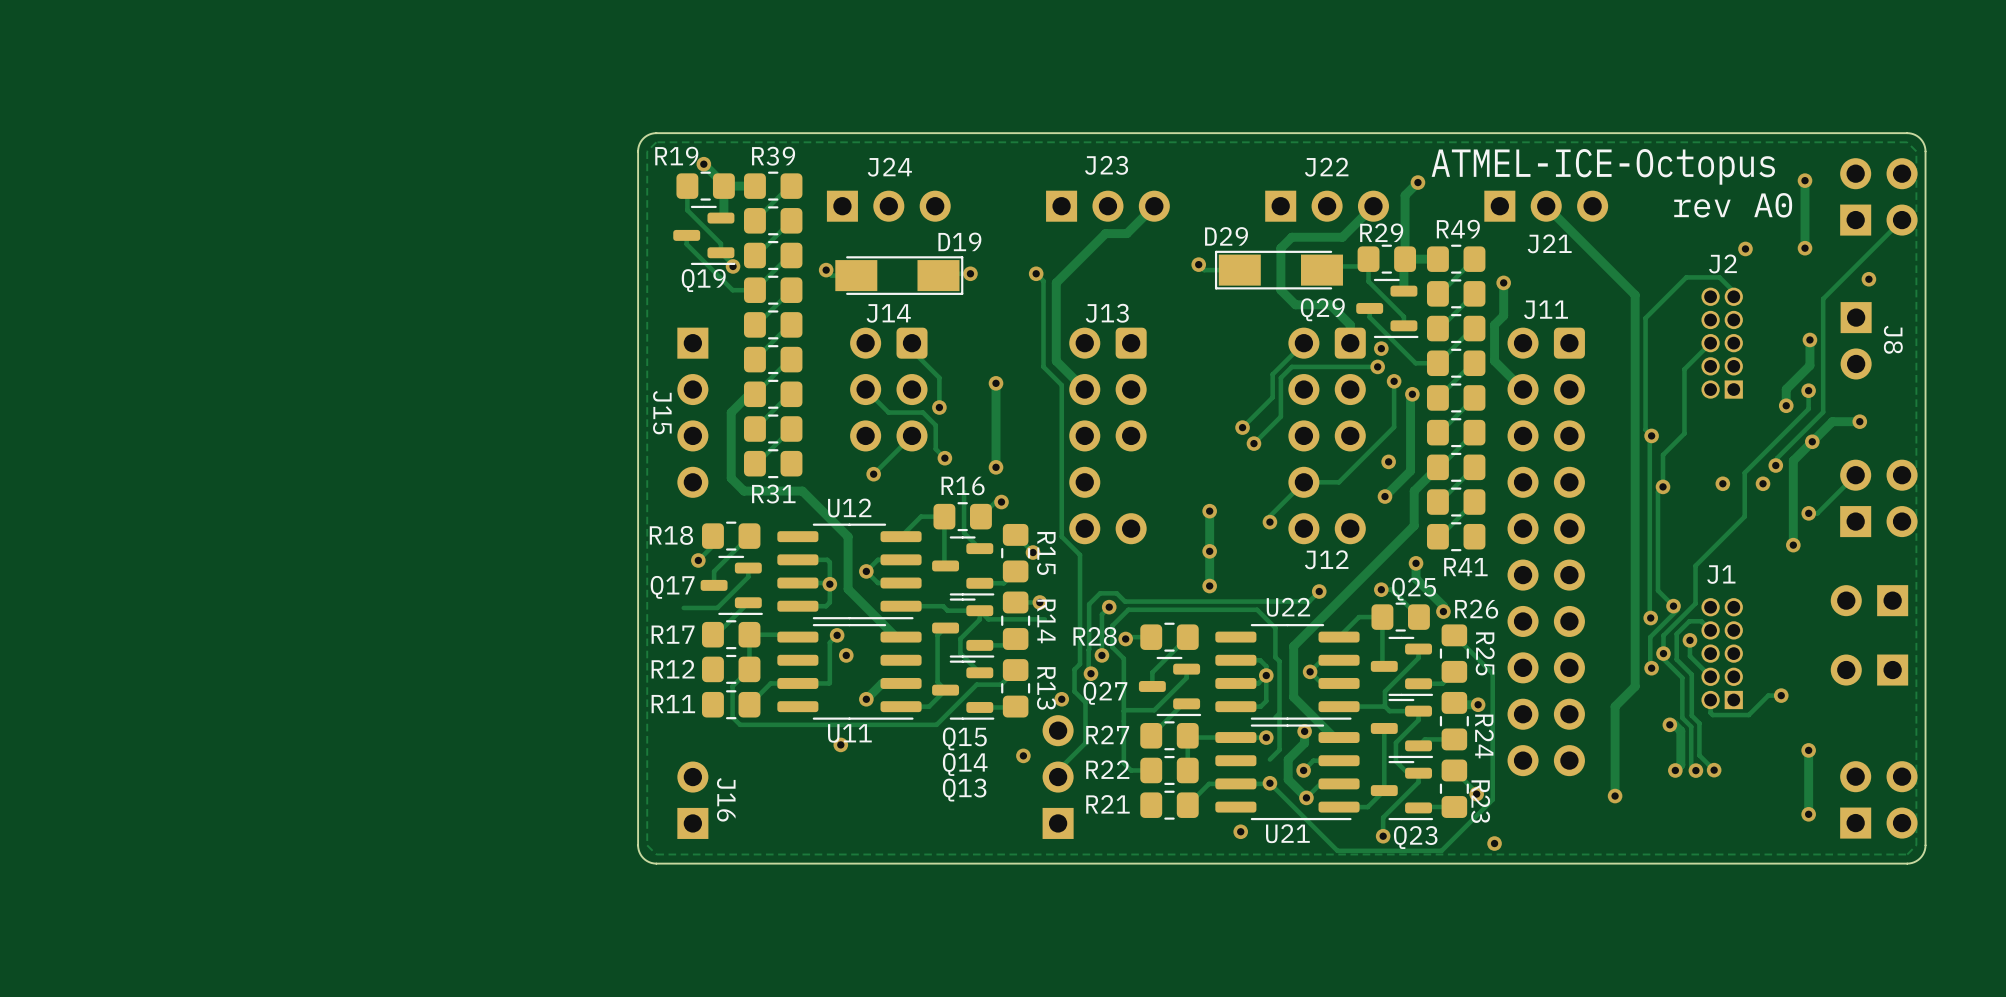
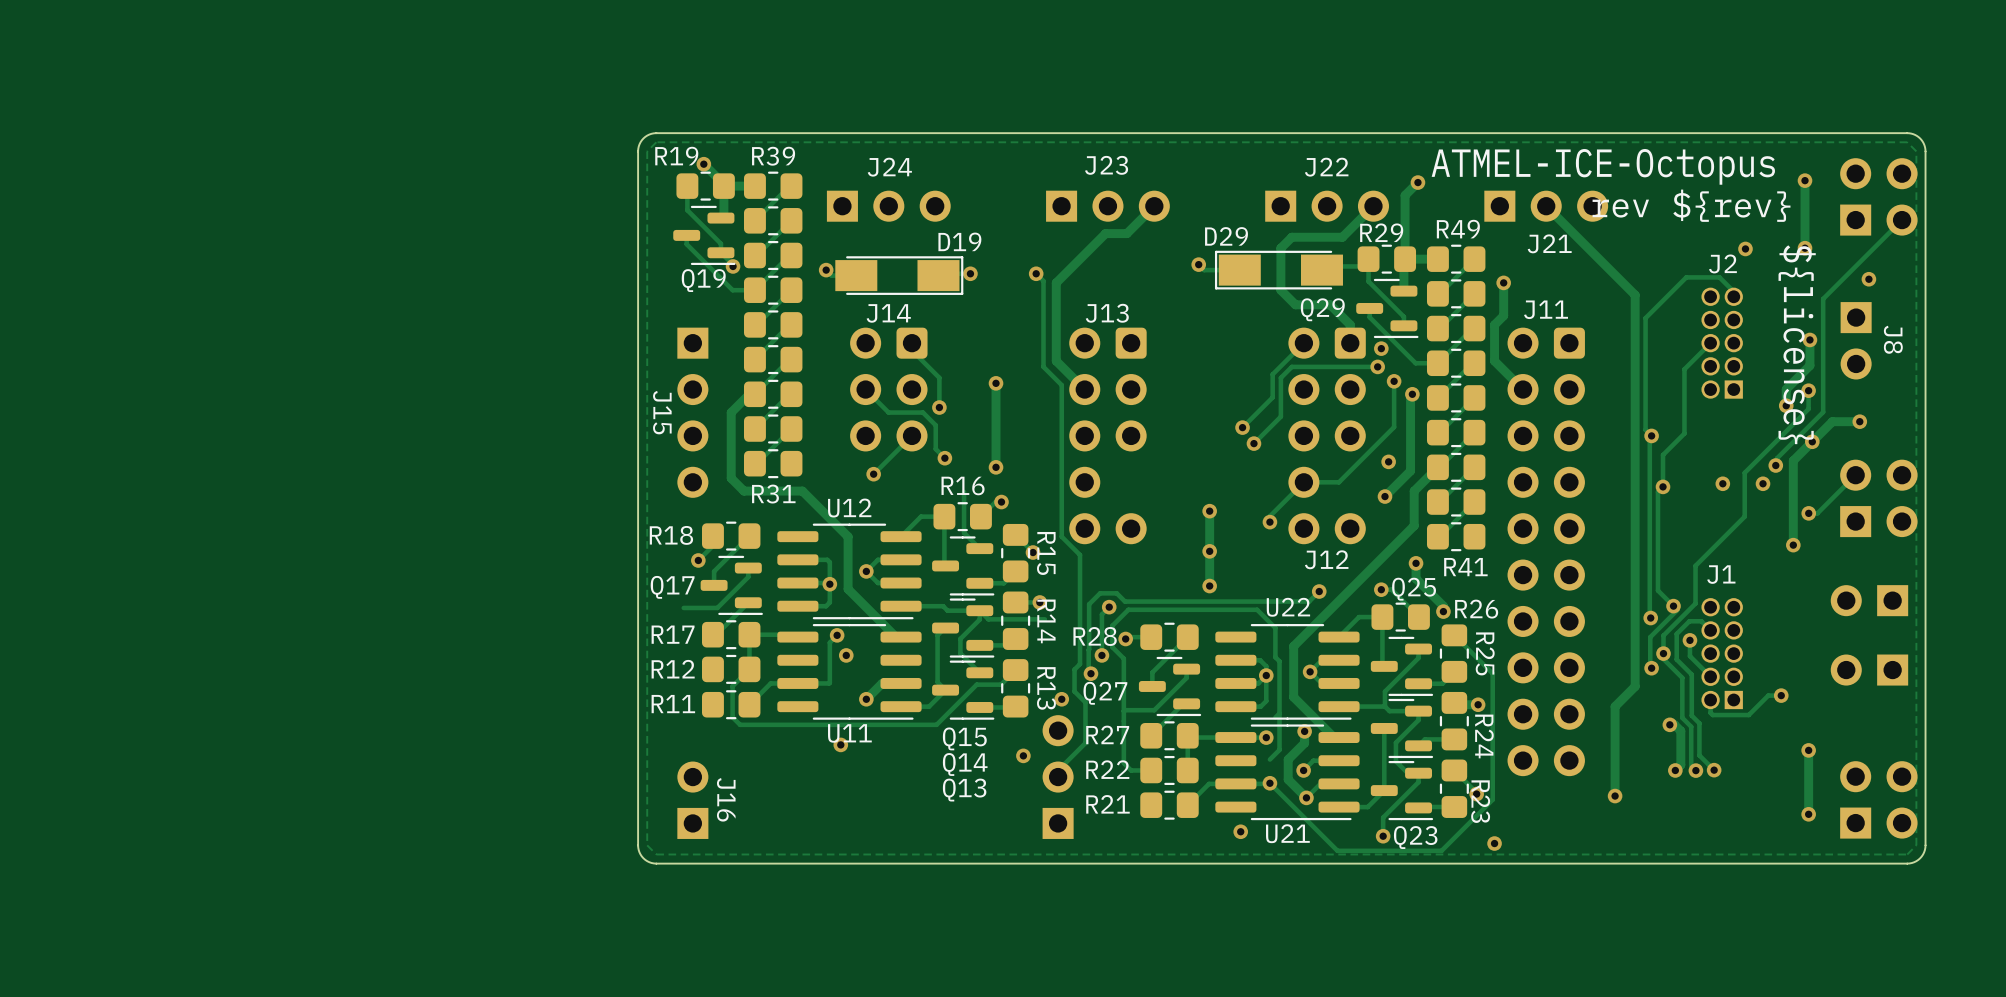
text: rev A0 (1733, 205) -> rev ${rev} (1691, 205)
text: none -> ${license} (1797, 344)

